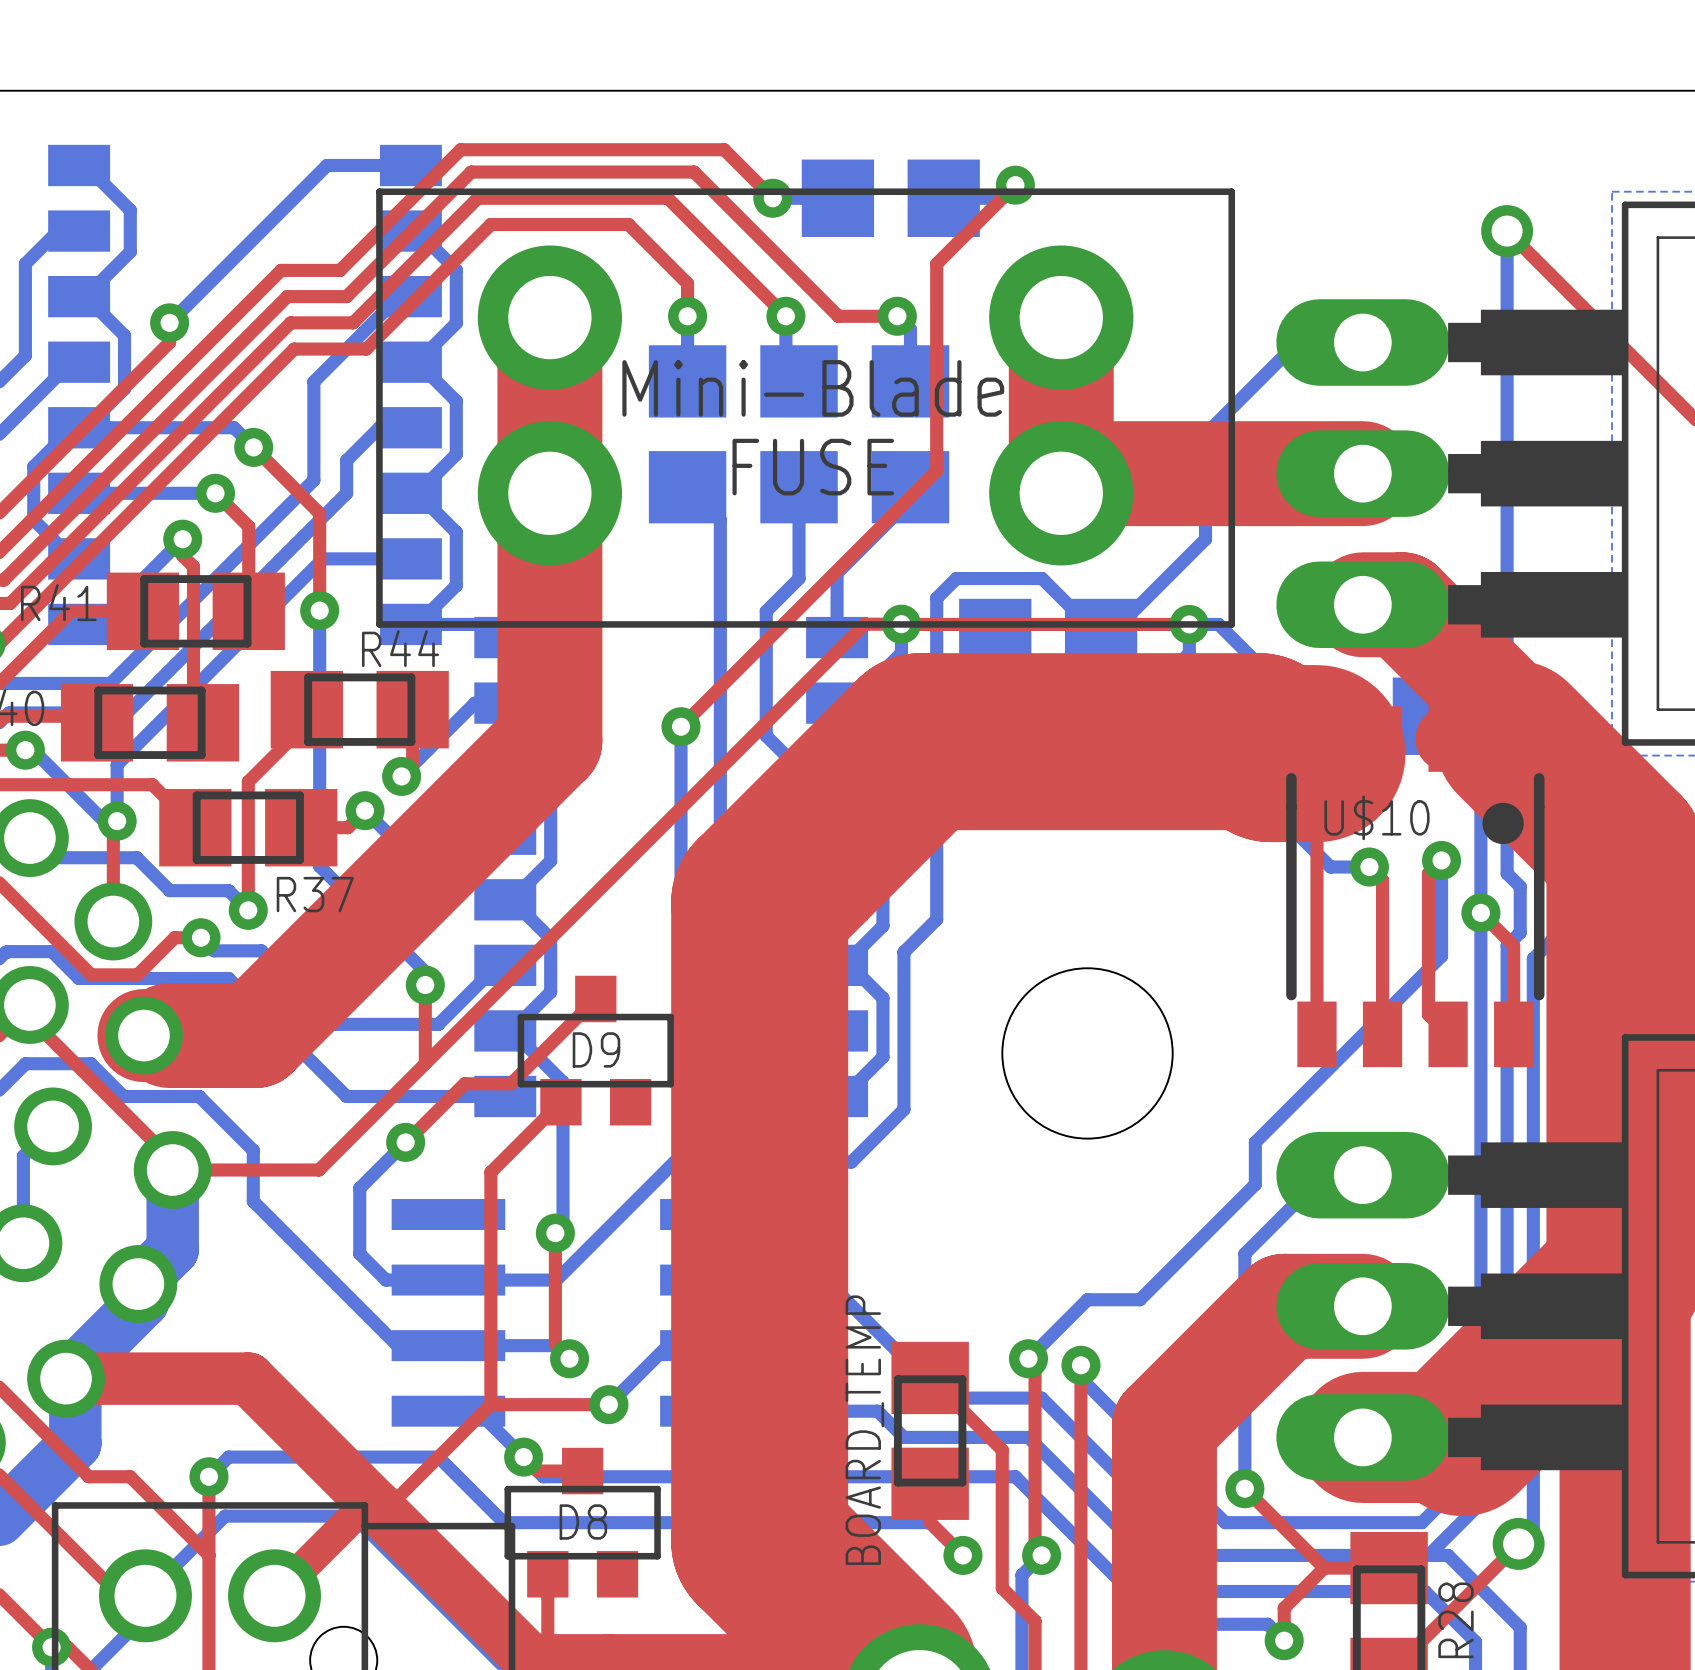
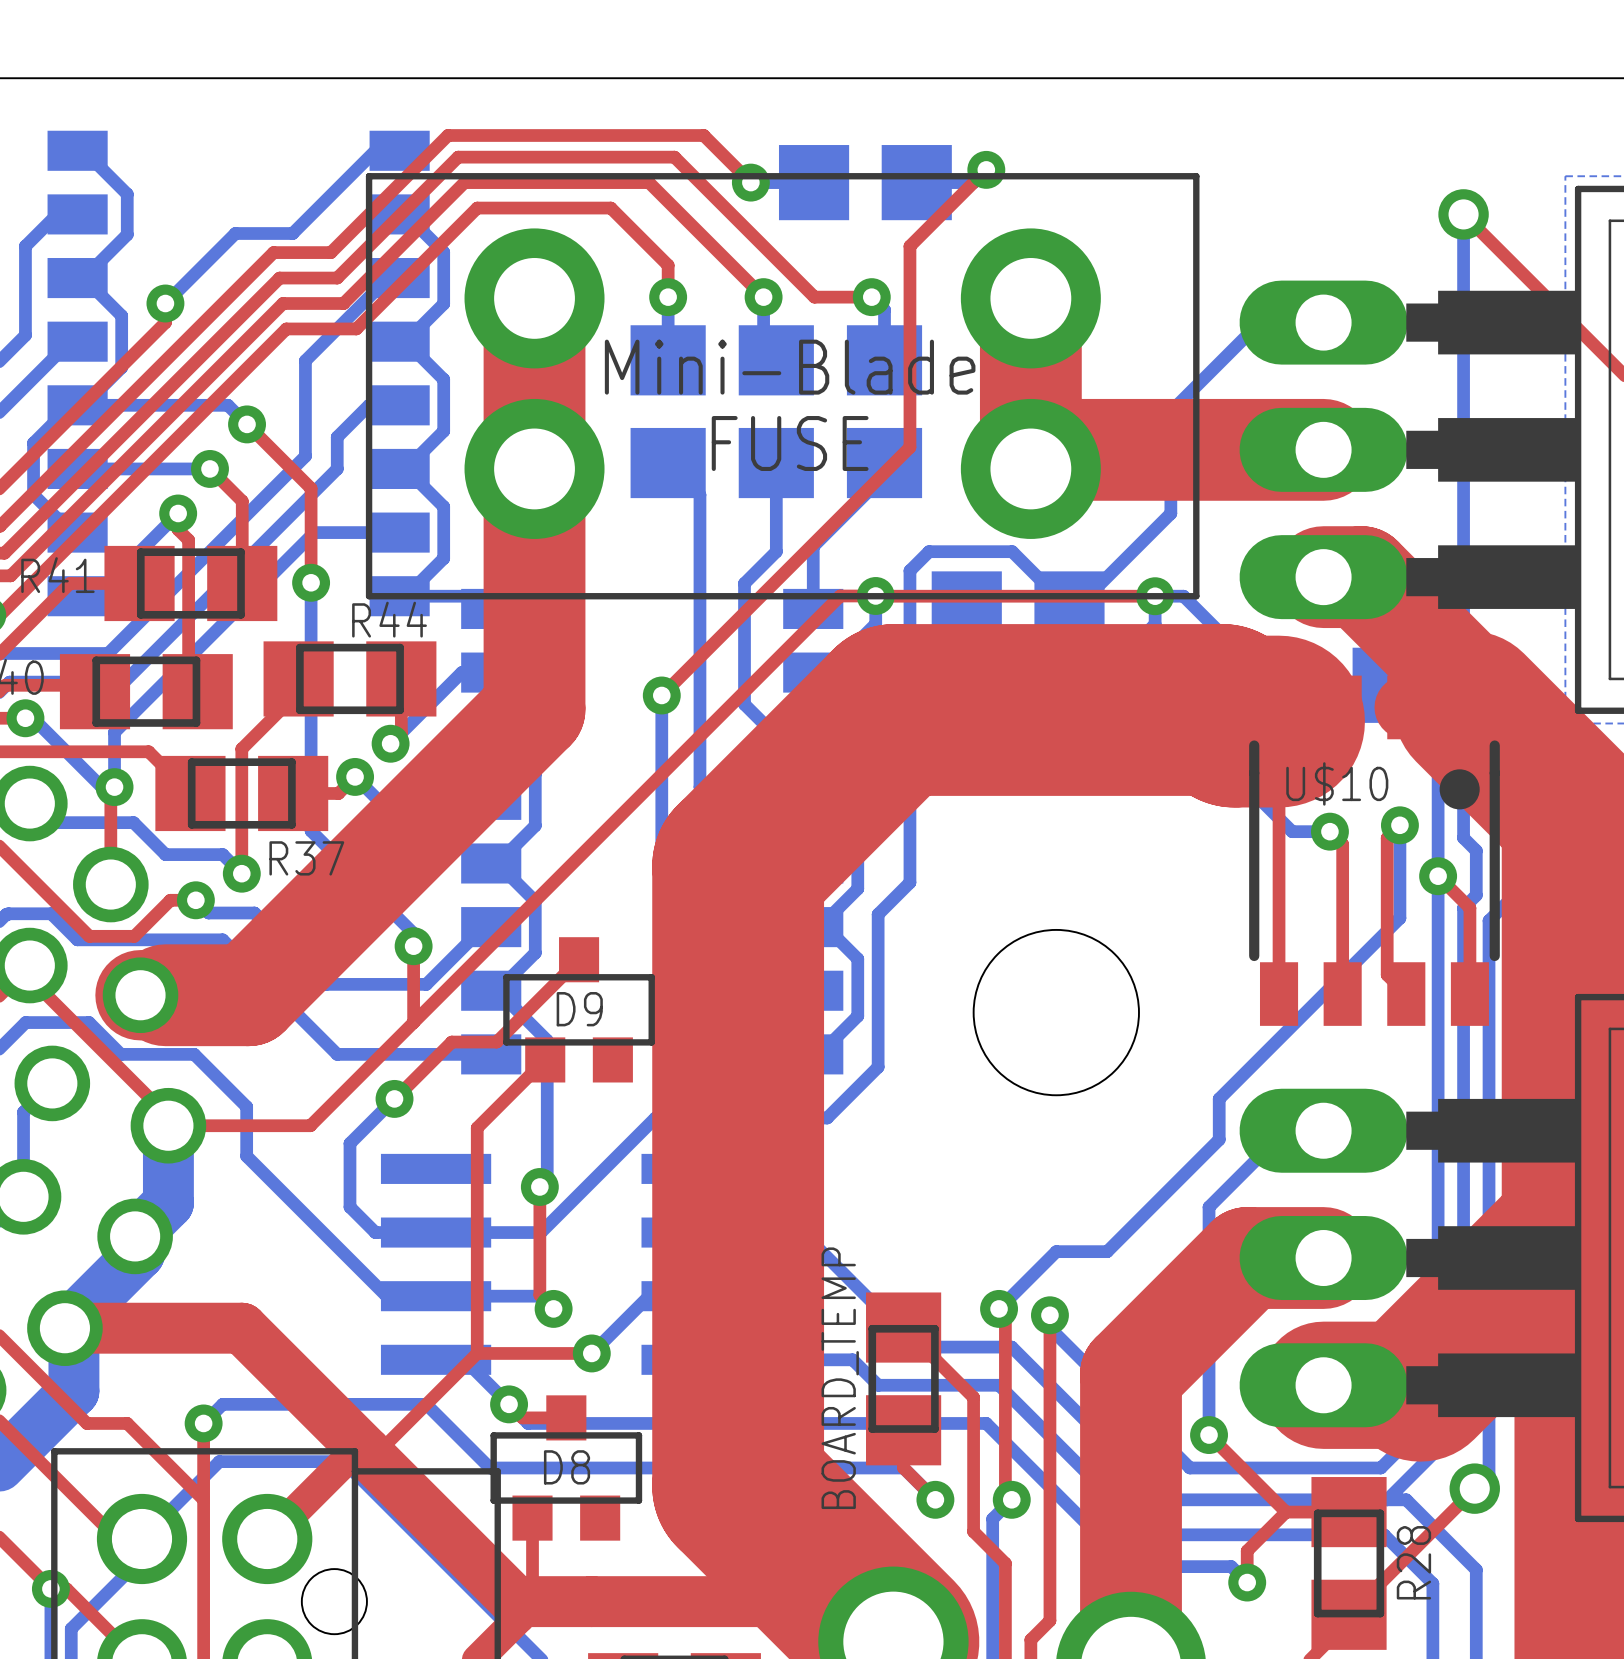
bottom track: (385, 165) (326, 165) (241, 250) -> (375, 150) (292, 233) (235, 233)

